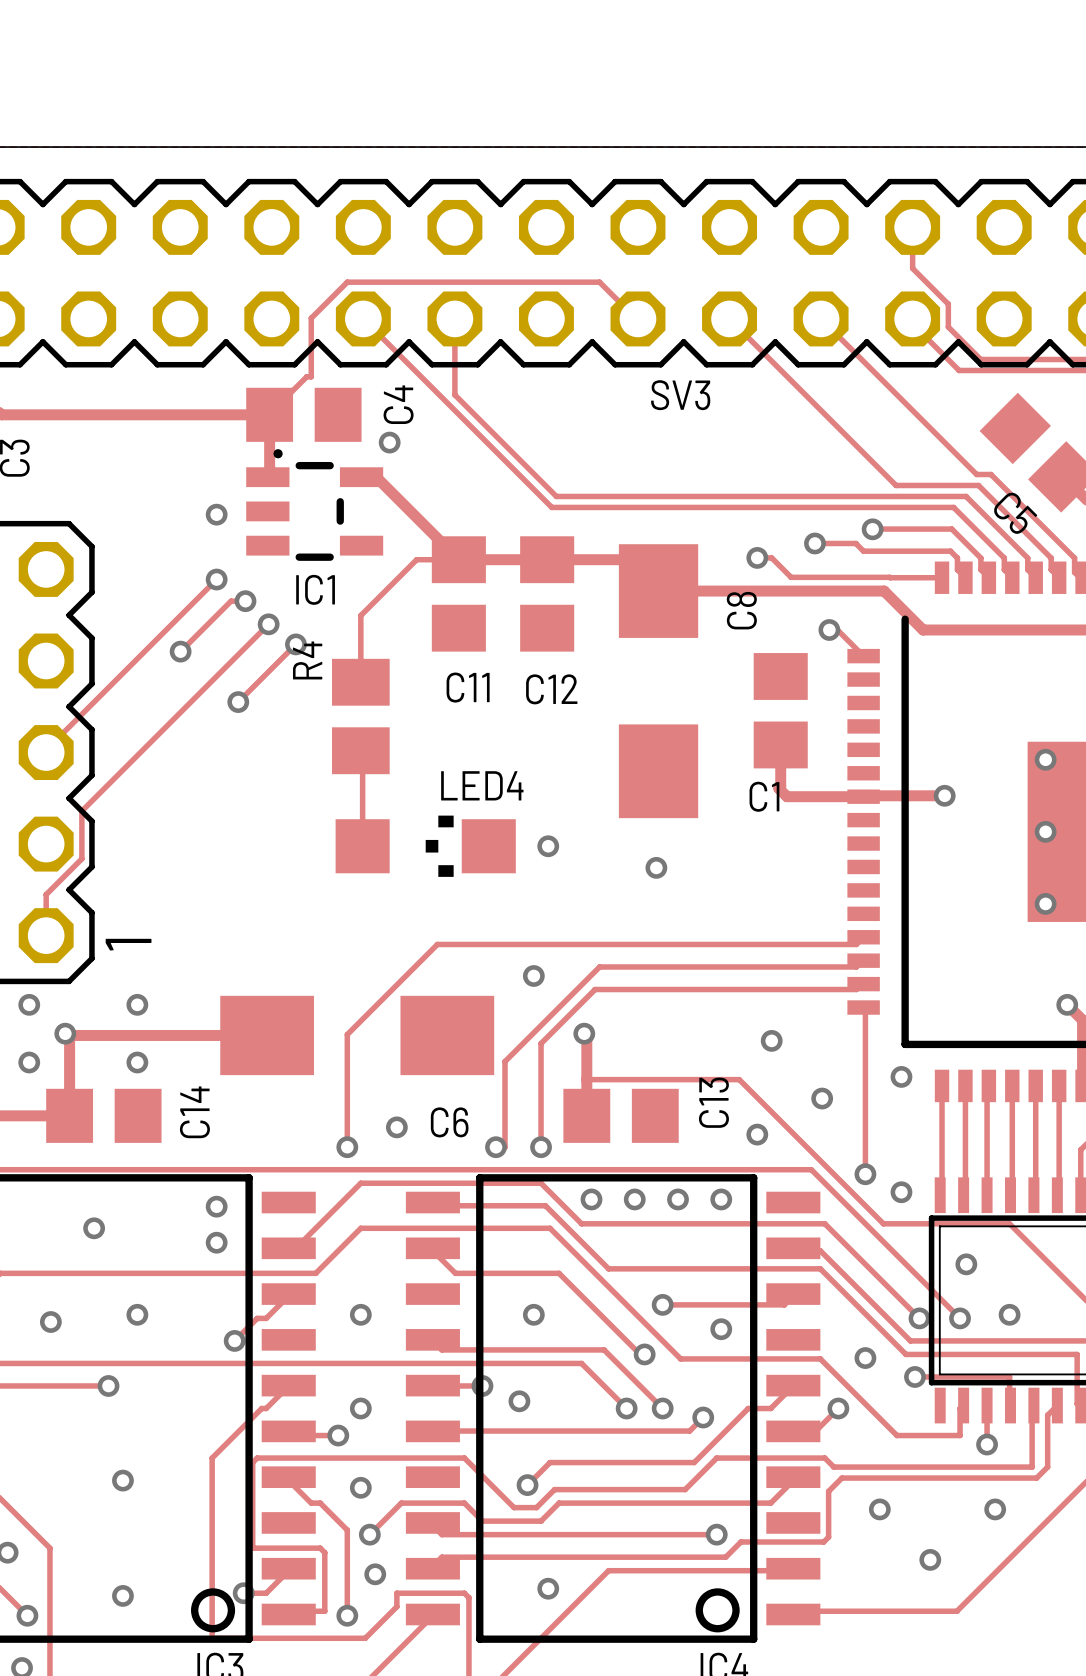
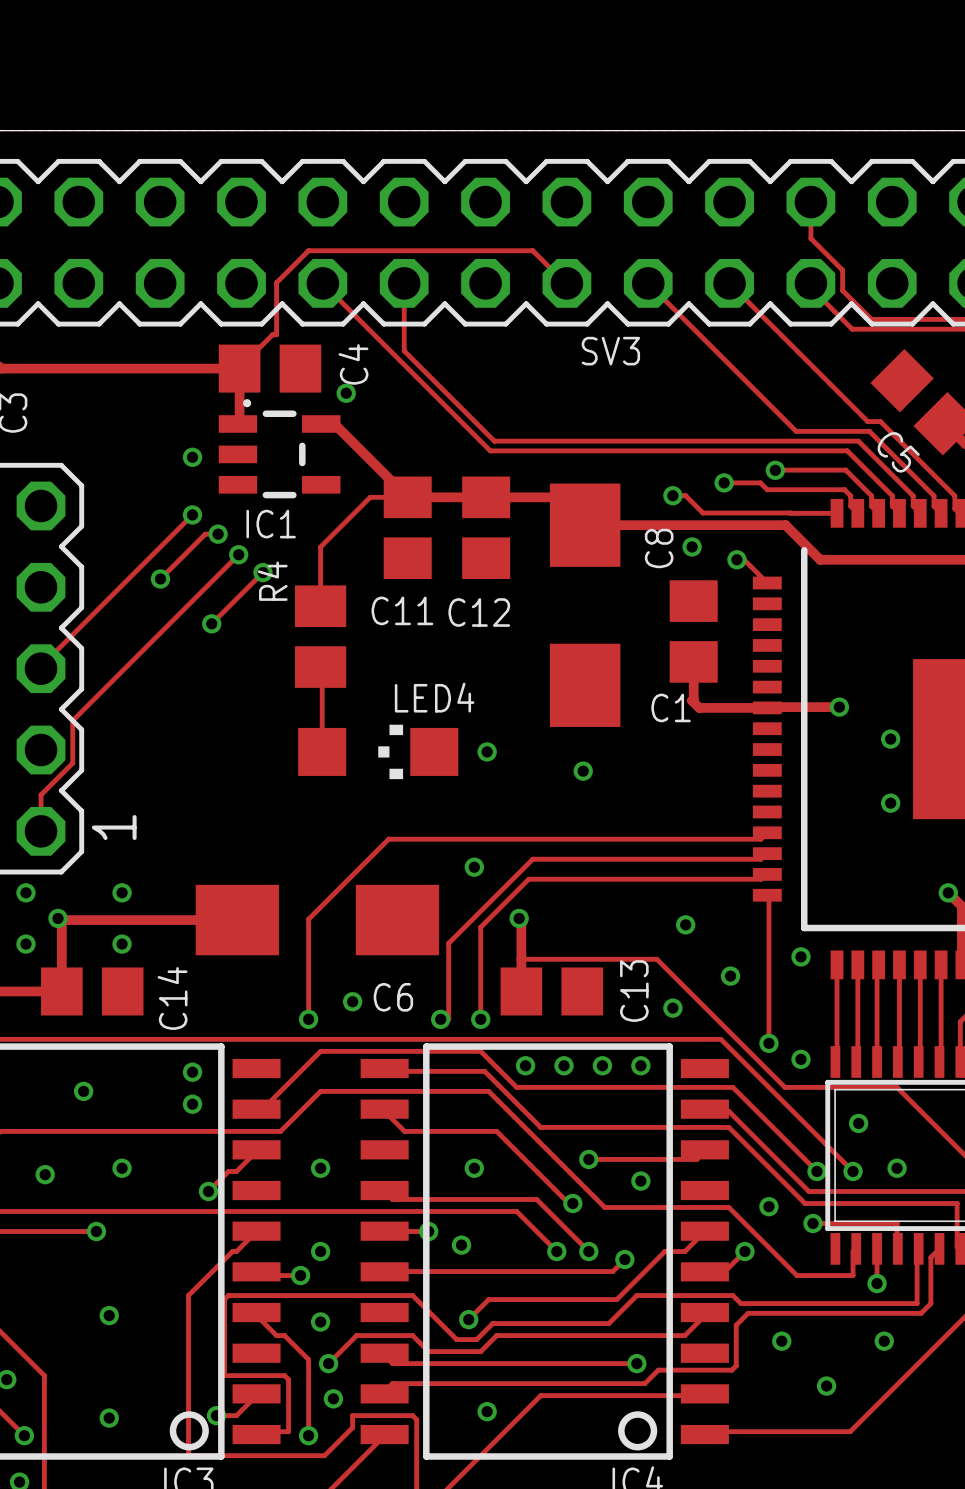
via: none -> (692, 546)
via: (1045, 759) -> none
via: none -> (890, 739)
via: (1045, 831) -> none
via: none -> (890, 803)
via: (1045, 903) -> none

